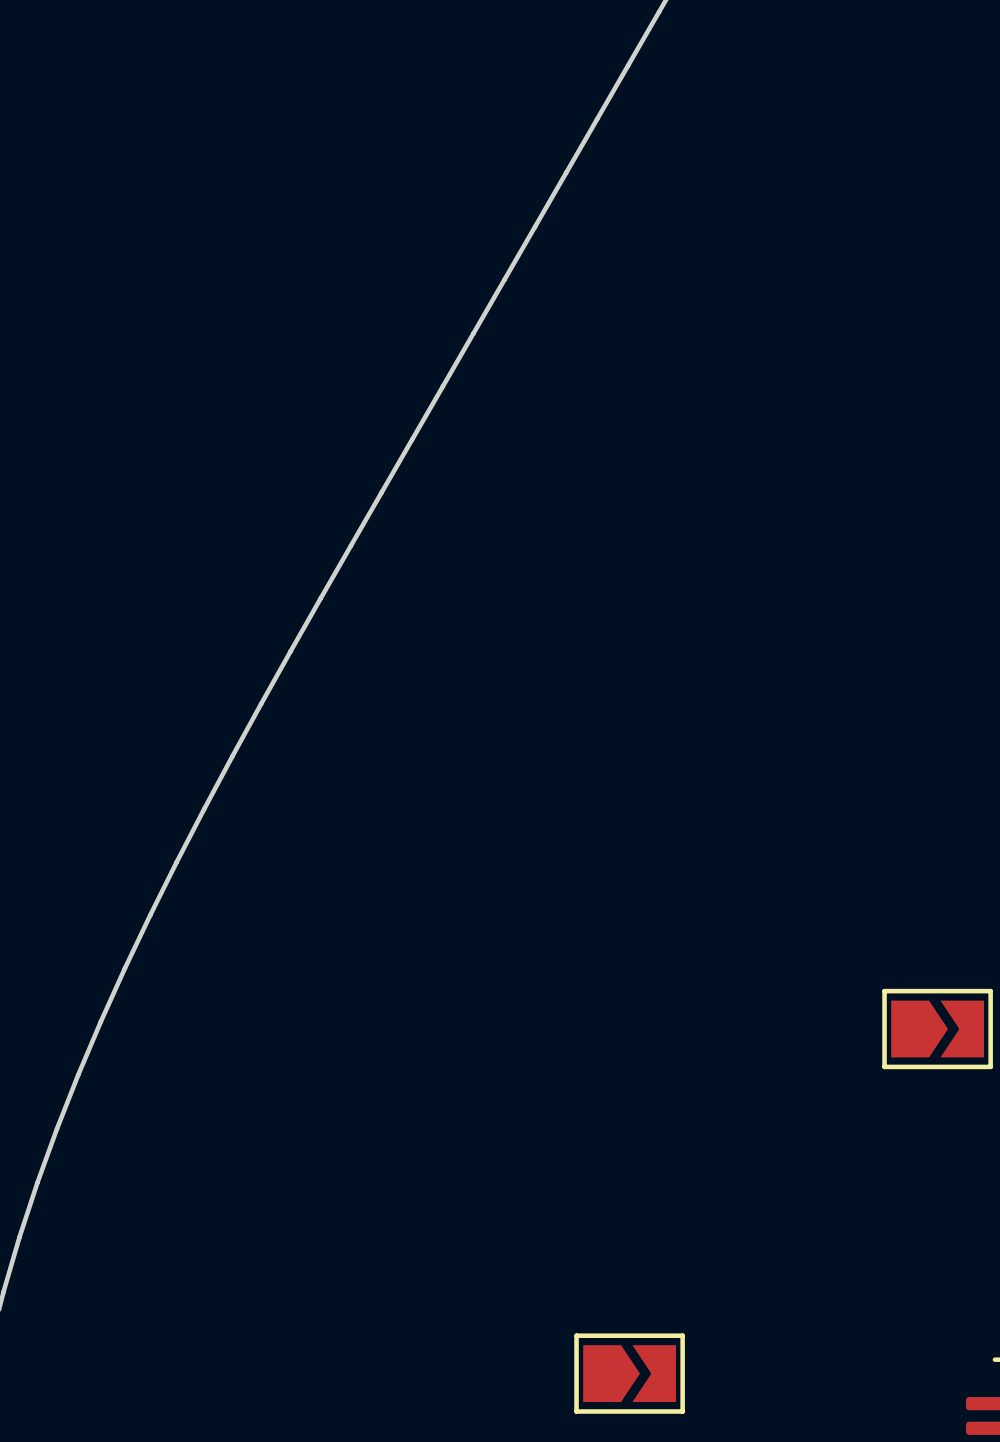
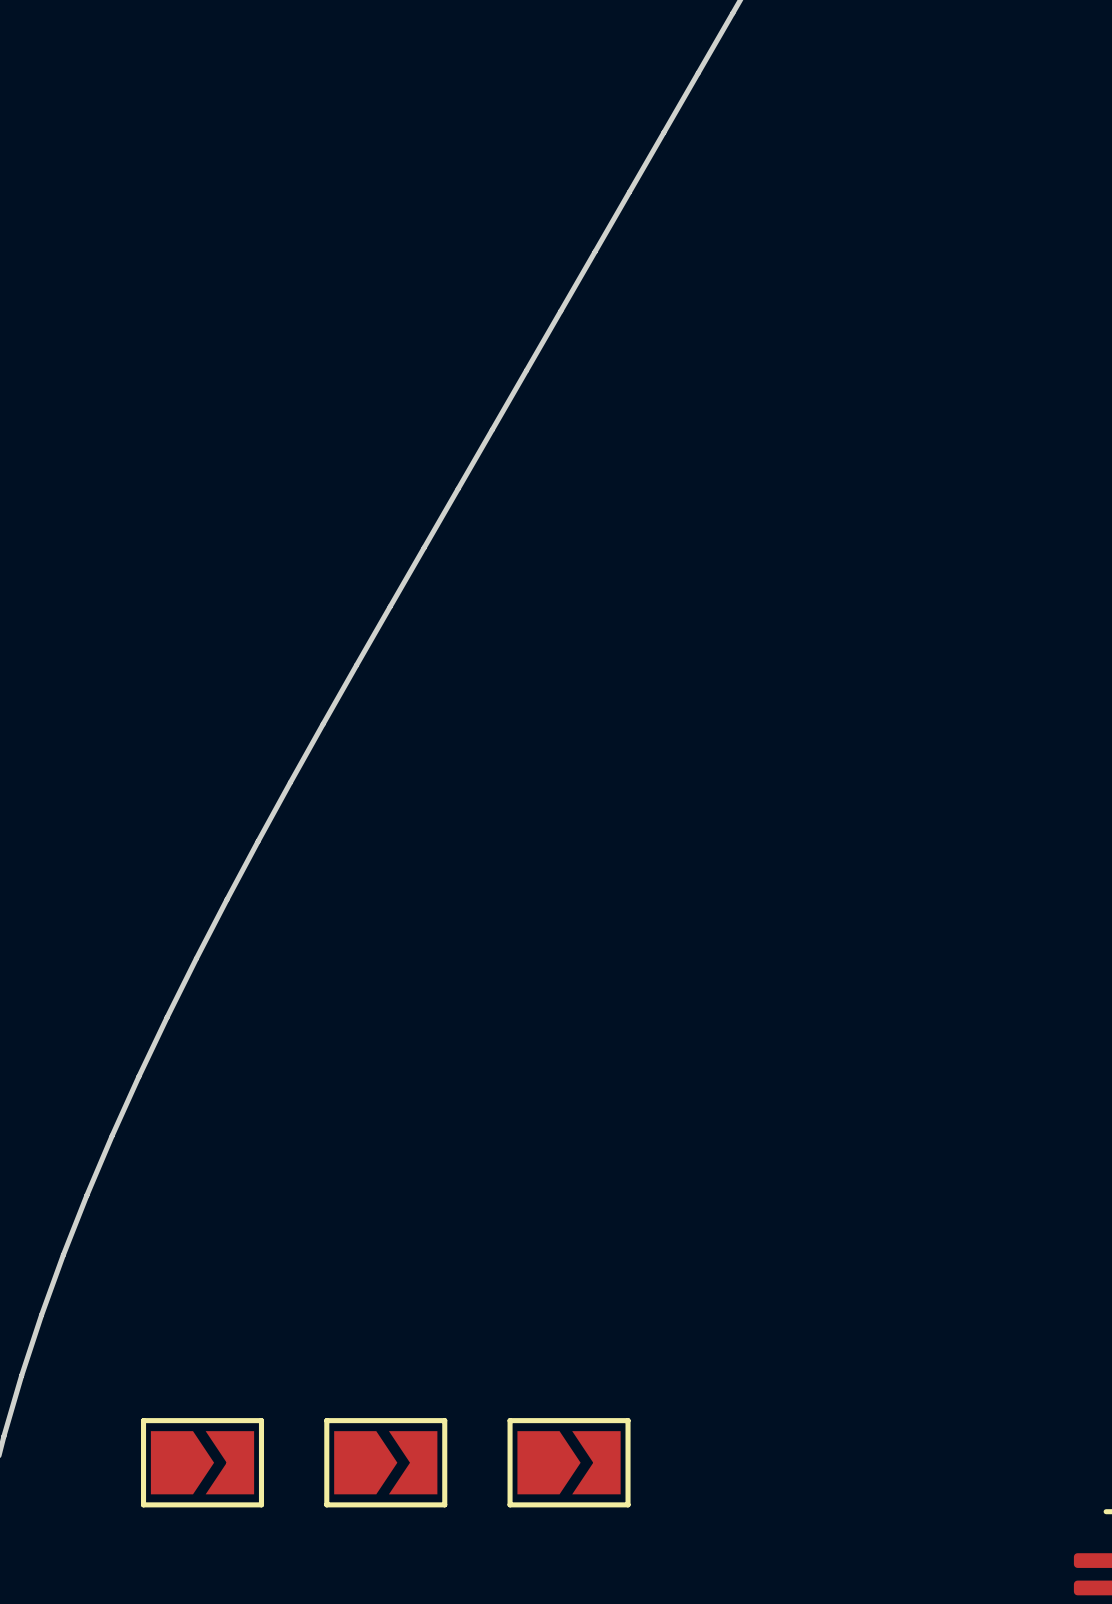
part: (937, 1029) -> none
part: none -> (202, 1462)
part: none -> (385, 1462)
part position: (629, 1373) -> (569, 1462)

